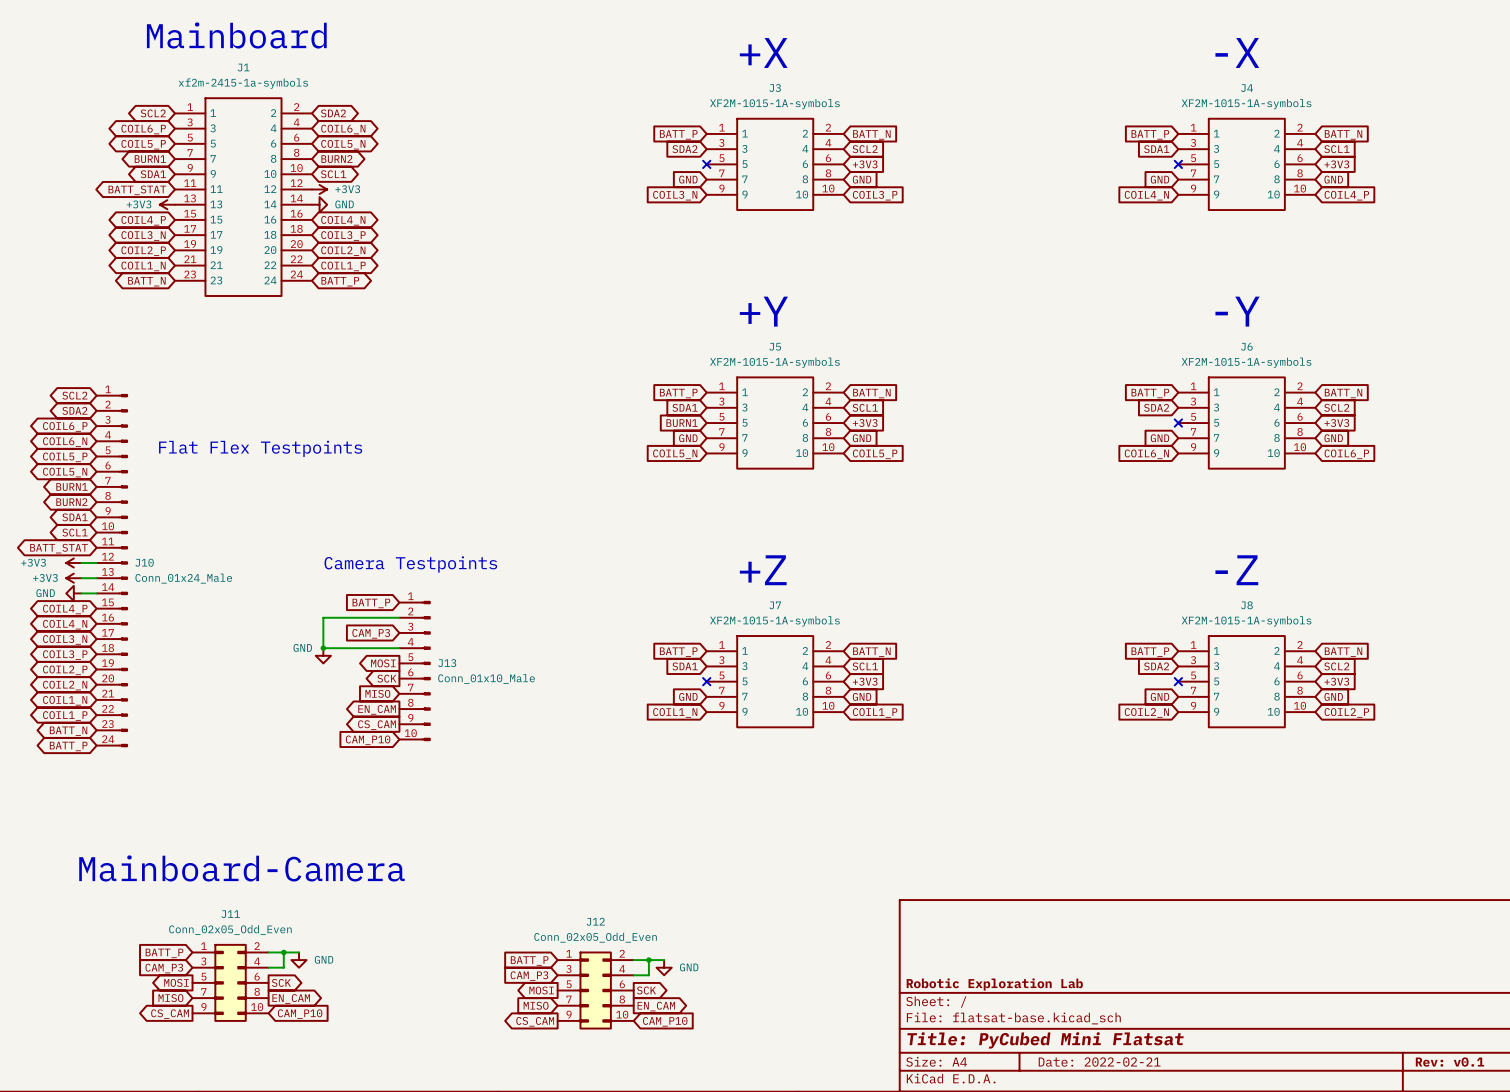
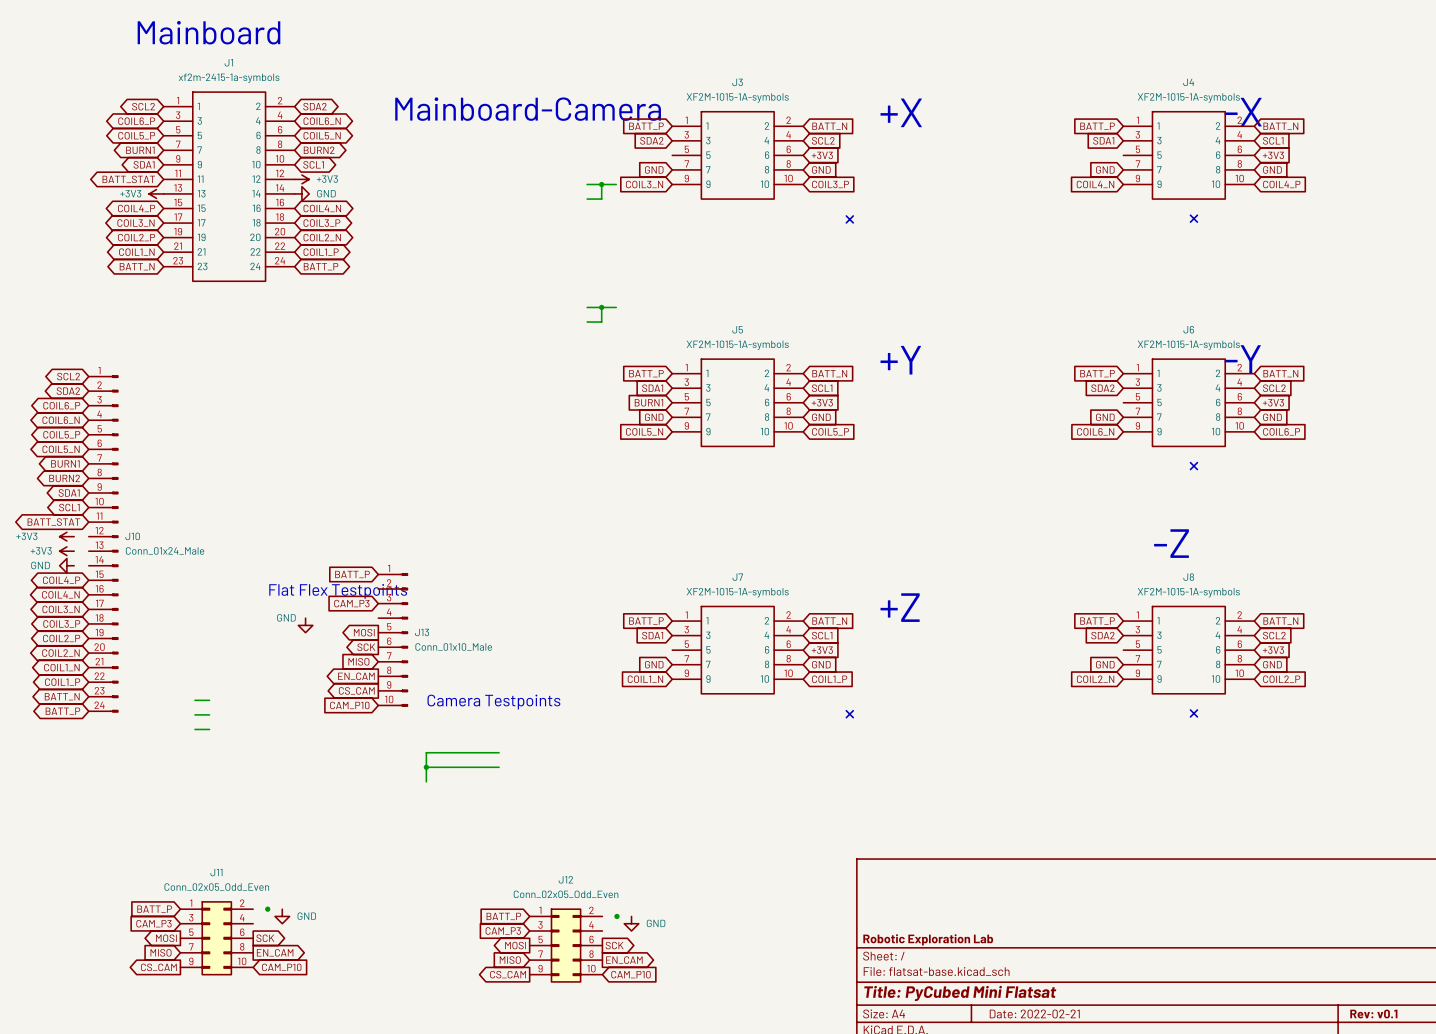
text: +X (763, 52) -> none
text position: -X (1237, 52) -> -X (1243, 112)
text: none -> Mainboard-Camera (528, 109)
text: none -> +X (901, 112)
no-connect mark: (706, 164) -> none
no-connect mark: (1178, 164) -> none
wire: none -> (587, 184) (616, 184)
wire: none -> (601, 184) (601, 199) (587, 199)
junction: none -> (601, 184)
no-connect mark: none -> (1193, 218)
no-connect mark: none -> (849, 219)
text: +Y (763, 311) -> none
text position: -Y (1237, 311) -> -Y (1242, 359)
wire: none -> (587, 307) (616, 307)
wire: none -> (601, 307) (601, 322) (587, 322)
junction: none -> (601, 307)
text: none -> +Y (900, 360)
no-connect mark: (1178, 423) -> none
text: Flat Flex Testpoints (260, 448) -> none
no-connect mark: none -> (1193, 466)
wire: (81, 562) (96, 562) -> none
text: Camera Testpoints (410, 564) -> none
text: +Z (763, 570) -> none
wire: (81, 578) (96, 578) -> none
wire: (81, 593) (96, 593) -> none
wire: (399, 617) (323, 617) (323, 648) (399, 648) -> none
text: none -> Flat Flex Testpoints (338, 591)
text: none -> +Z (900, 607)
junction: (323, 648) -> none
no-connect mark: (706, 681) -> none
no-connect mark: (1178, 681) -> none
wire: none -> (194, 700) (209, 700)
text: none -> Camera Testpoints (493, 702)
no-connect mark: none -> (1193, 713)
no-connect mark: none -> (849, 714)
wire: none -> (194, 714) (209, 714)
wire: none -> (194, 729) (209, 729)
wire: none -> (499, 752) (426, 752) (426, 781)
wire: none -> (426, 767) (499, 767)
junction: none -> (426, 767)
text: Mainboard-Camera (241, 868) -> none
wire: (268, 952) (299, 952) -> none
wire: (283, 952) (283, 967) (268, 967) -> none
wire: (633, 960) (664, 960) -> none
wire: (648, 960) (648, 975) (633, 975) -> none

